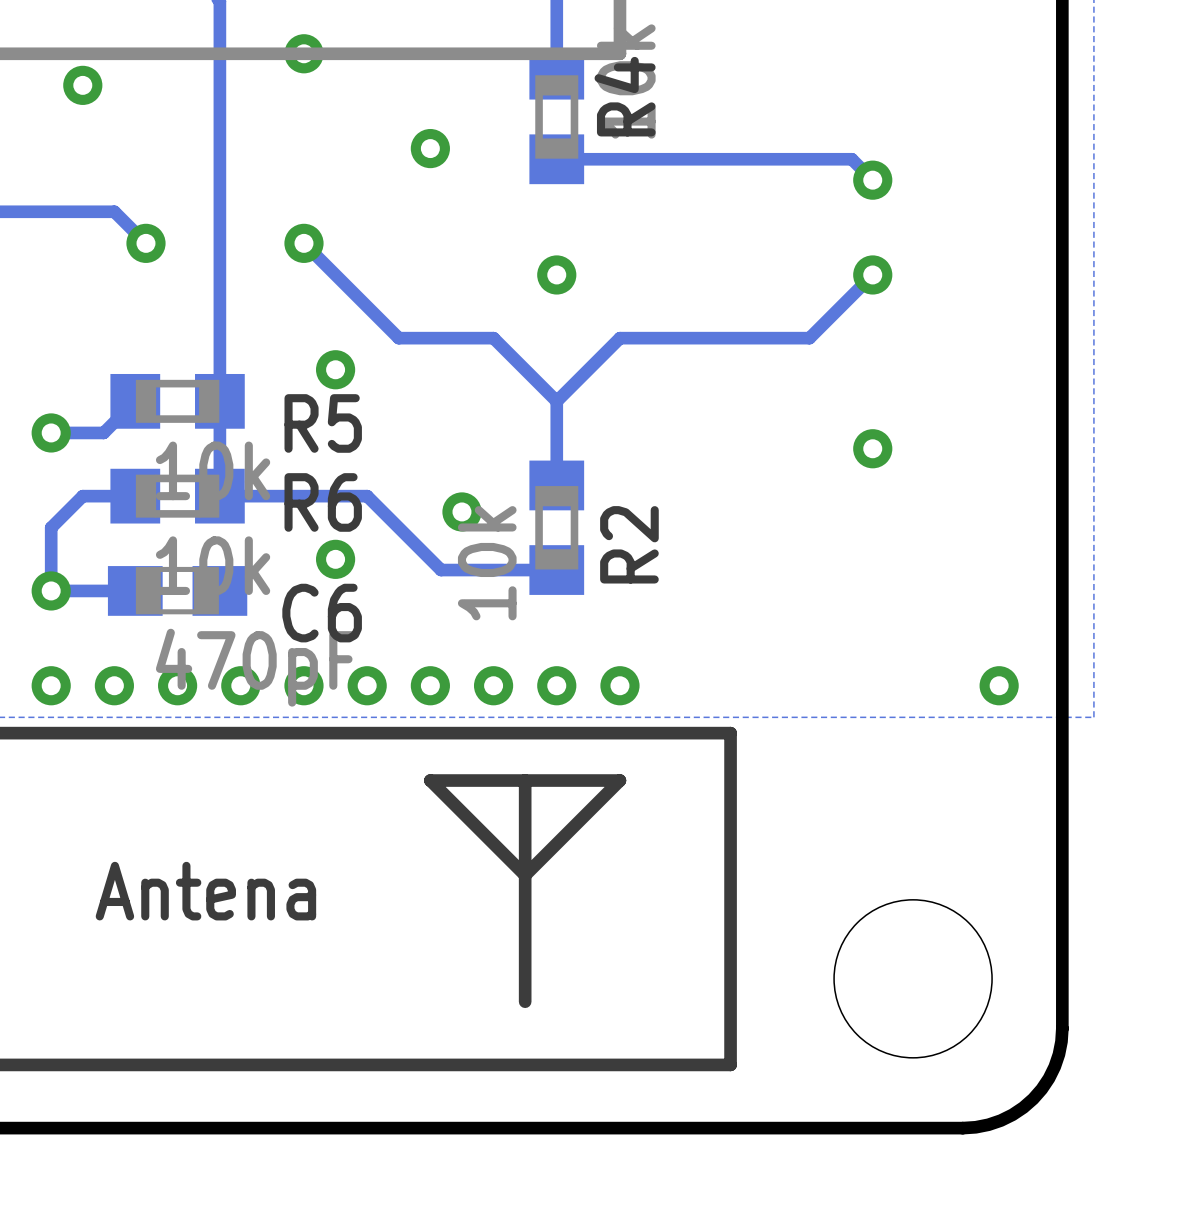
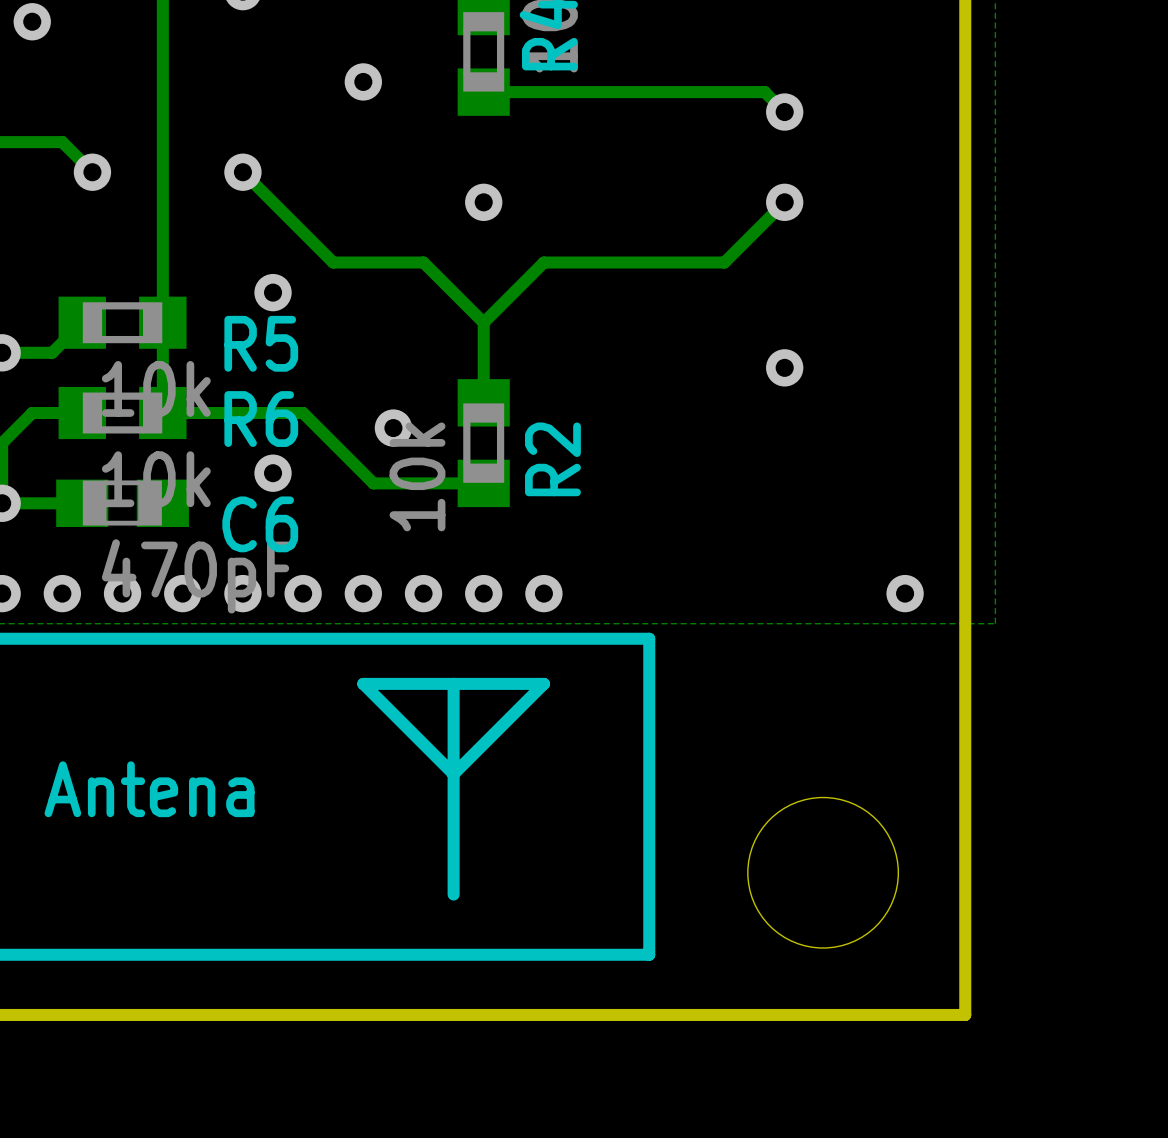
board edge: (1062, 1028) (1058, 1054) (1054, 1066) (1049, 1078) (1033, 1098) (1012, 1114) (1000, 1120) (988, 1124) (962, 1128) -> (965, 920) (965, 1014) (870, 1014)

